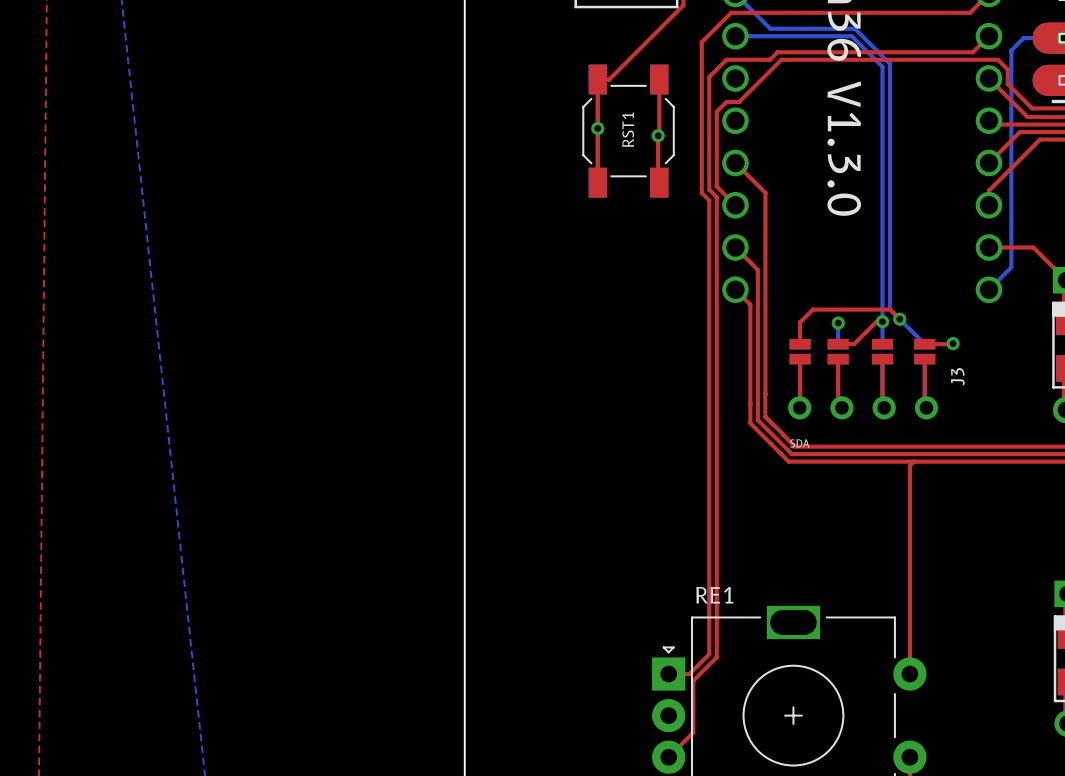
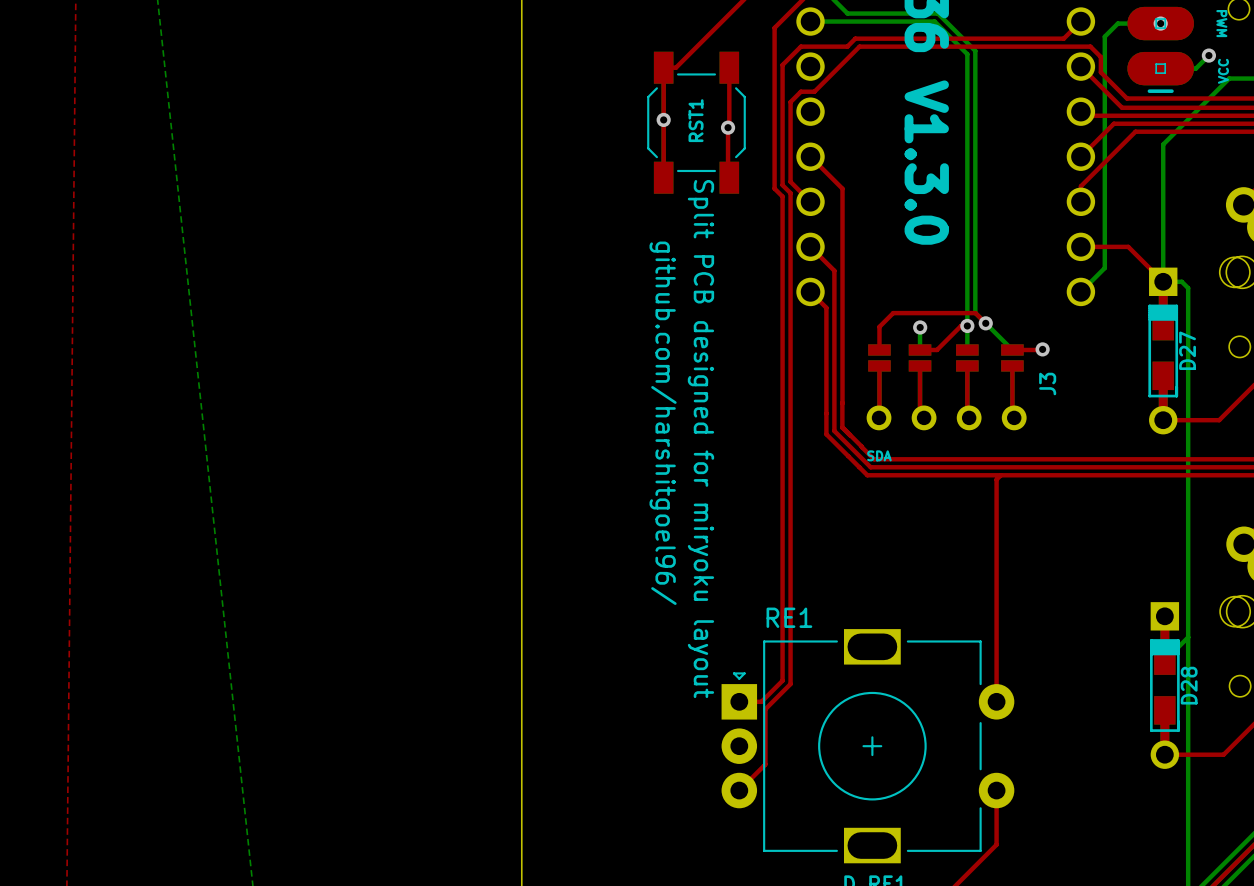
text: none -> github.com/harshitgoel96/ (663, 423)
text: none -> Split PCB designed for miryoku layout (700, 439)

